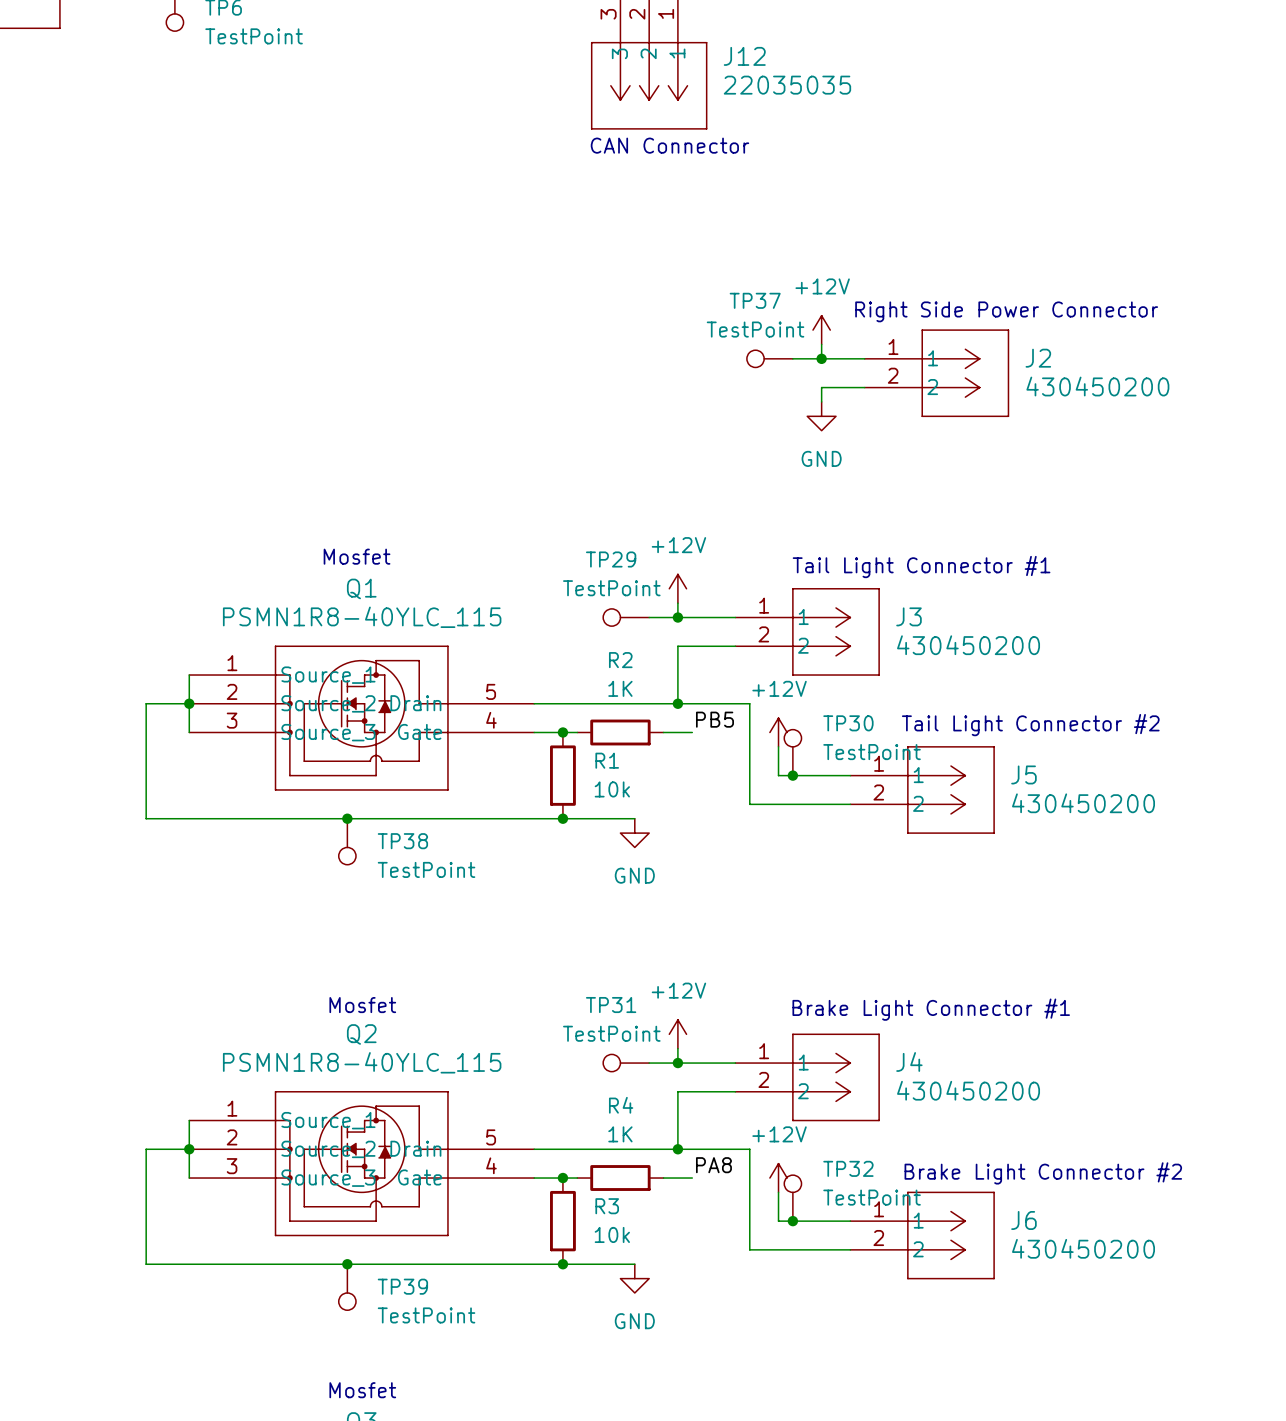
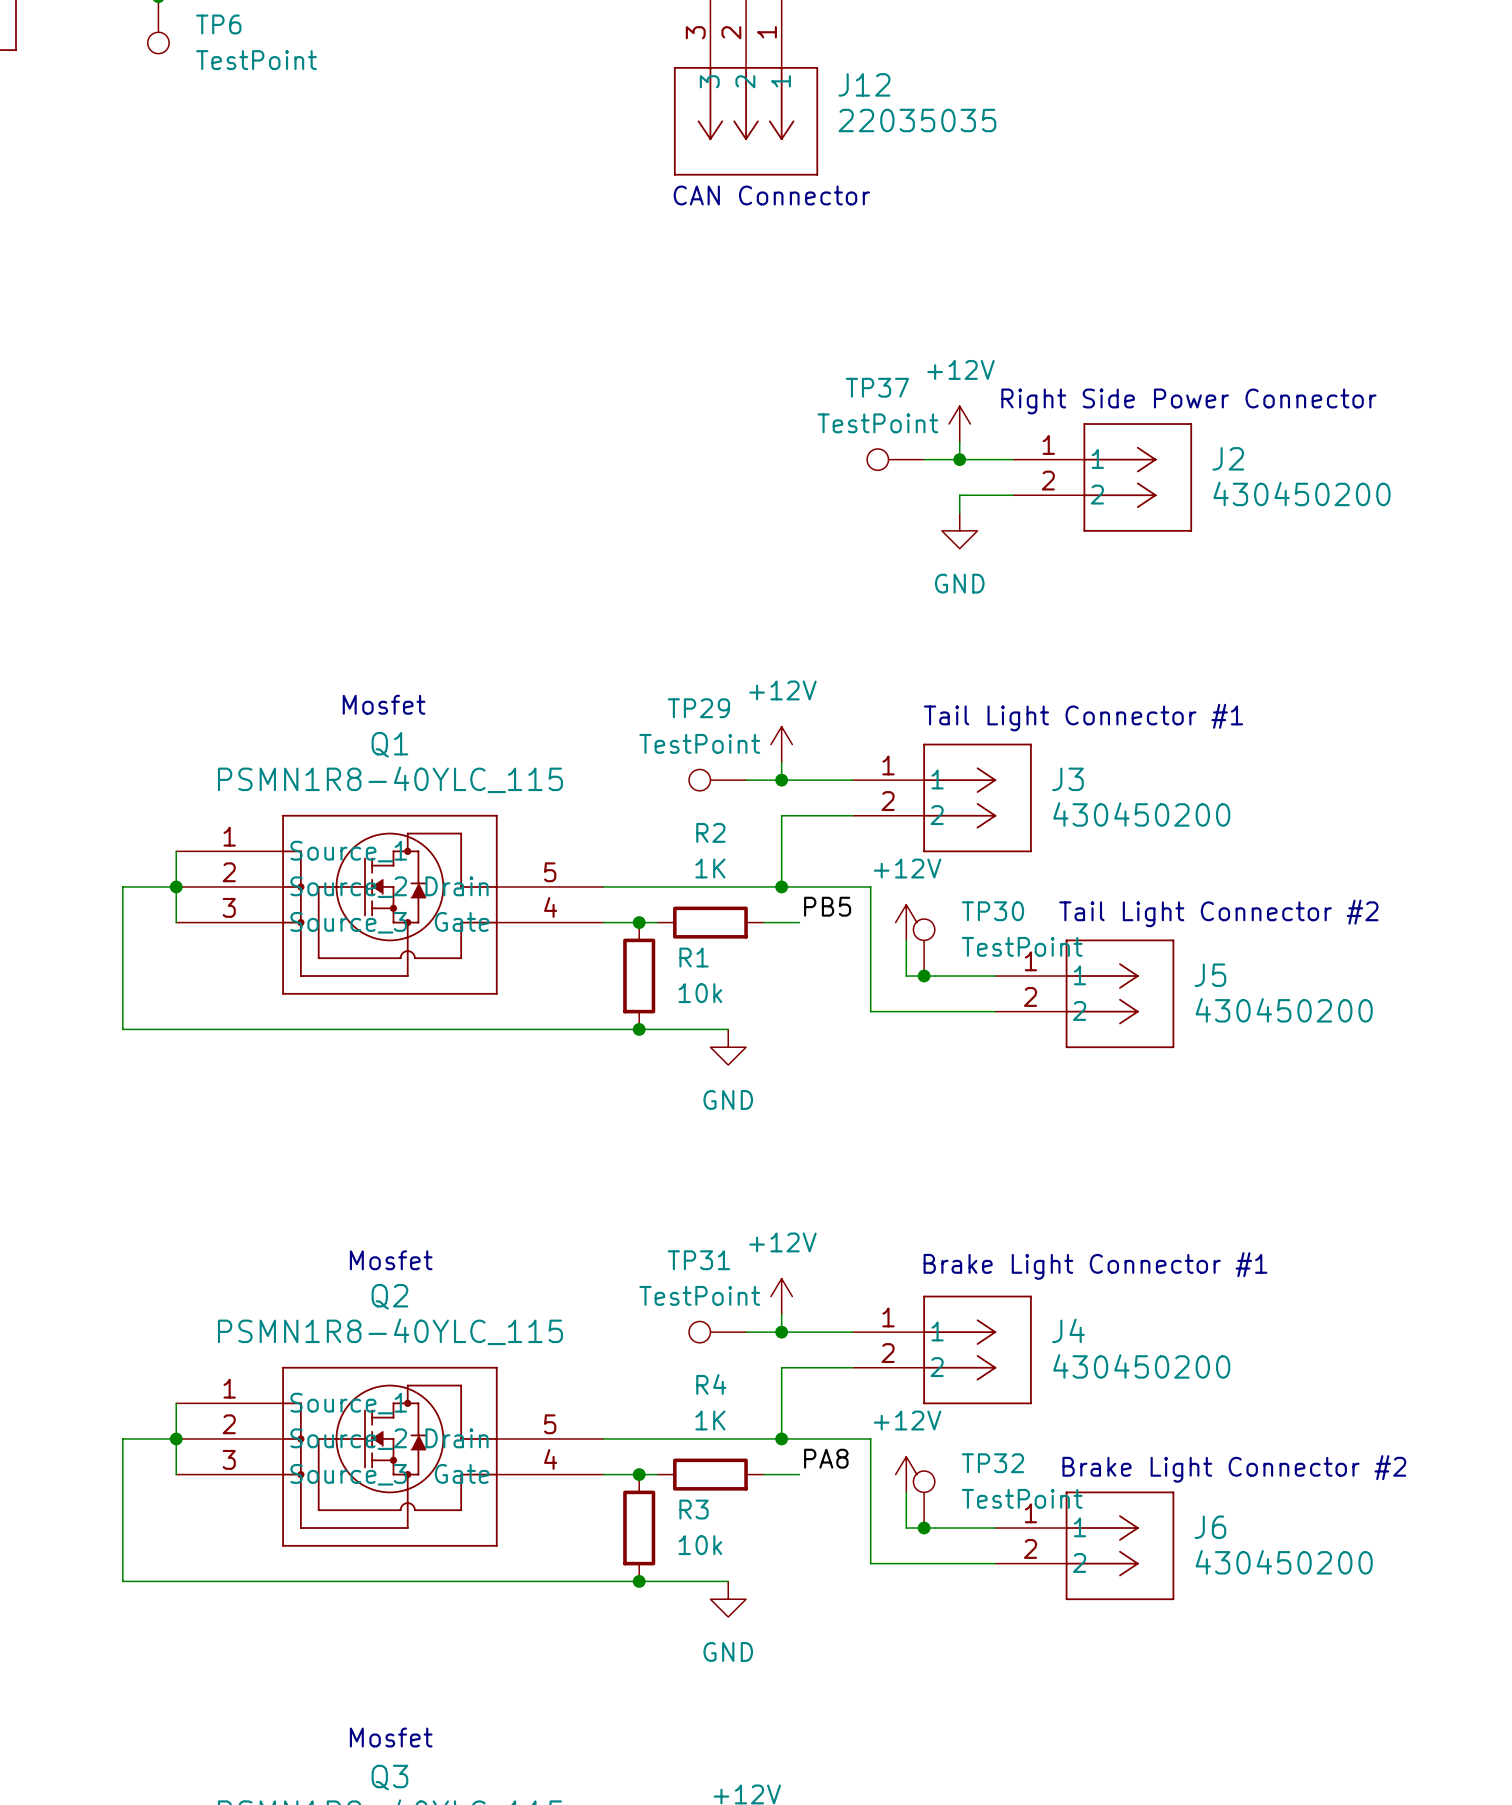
junction: (347, 818) -> none
TP38: TestPoint (347, 841) -> none
junction: (347, 1264) -> none
TP39: TestPoint (347, 1287) -> none

